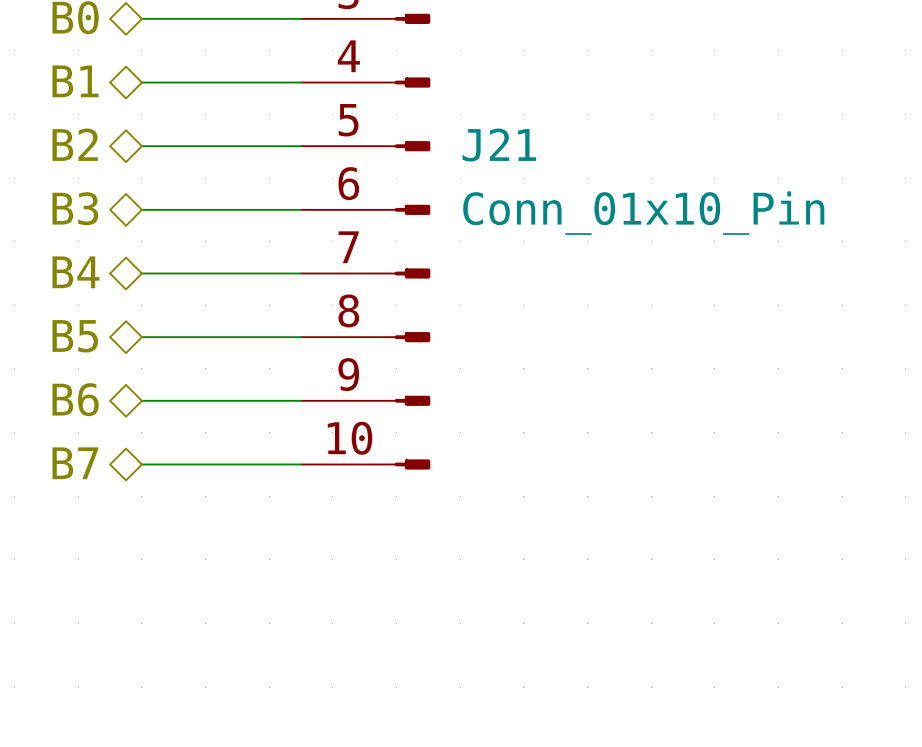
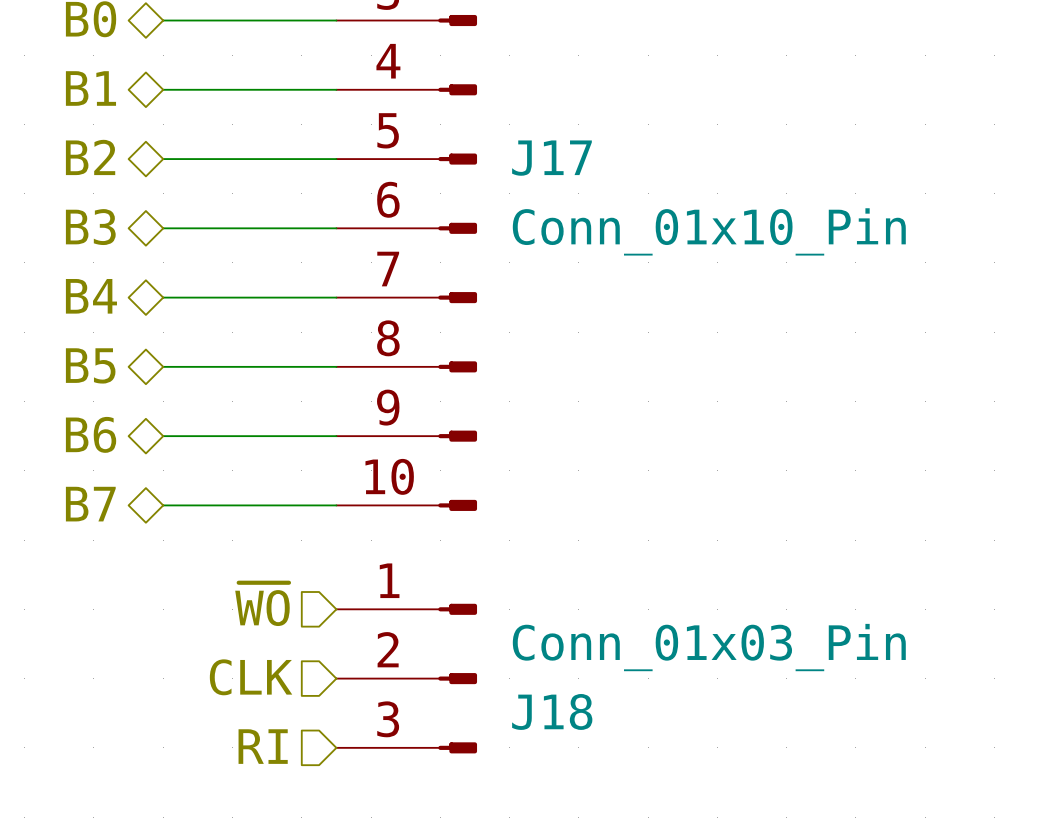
J21 name: J21 (499, 145) -> J17 (551, 158)
hierarchical label: none -> ~{WO} (262, 604)
hierarchical label: none -> CLK (251, 677)
J18: none -> Conn_01x03_Pin (406, 678)
hierarchical label: none -> RI (263, 746)

